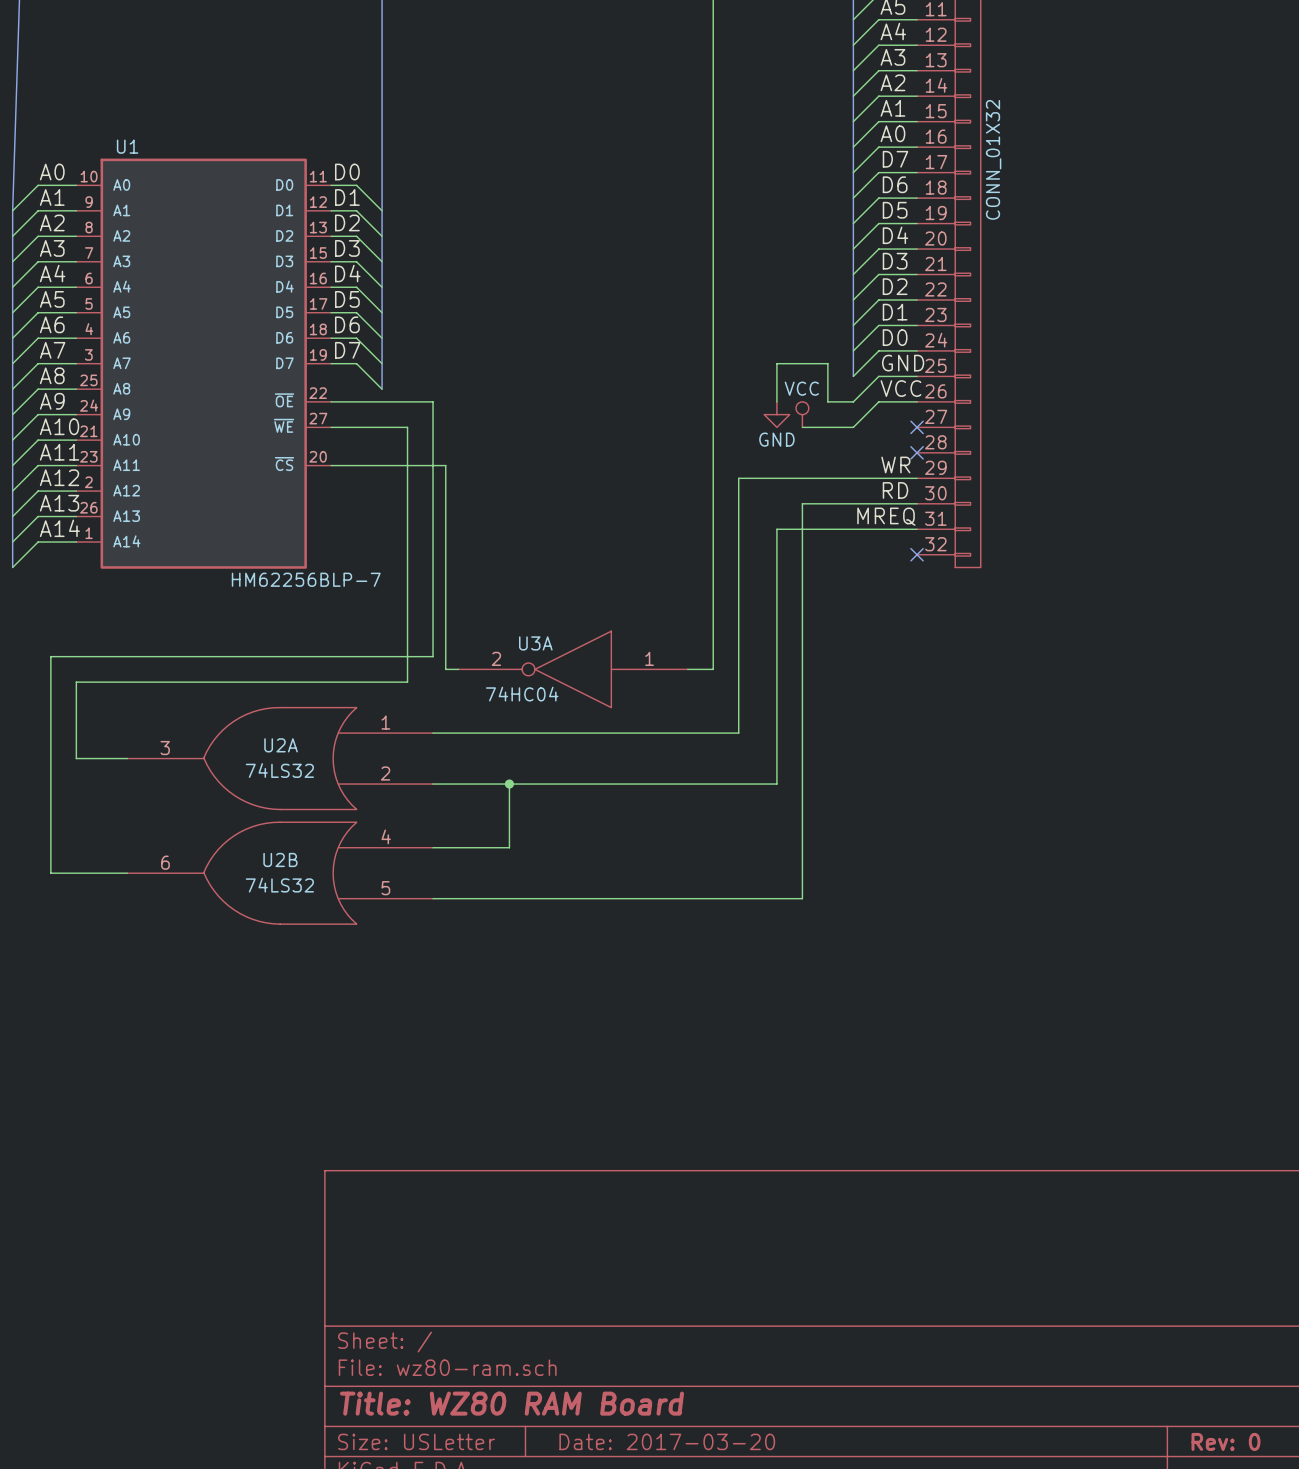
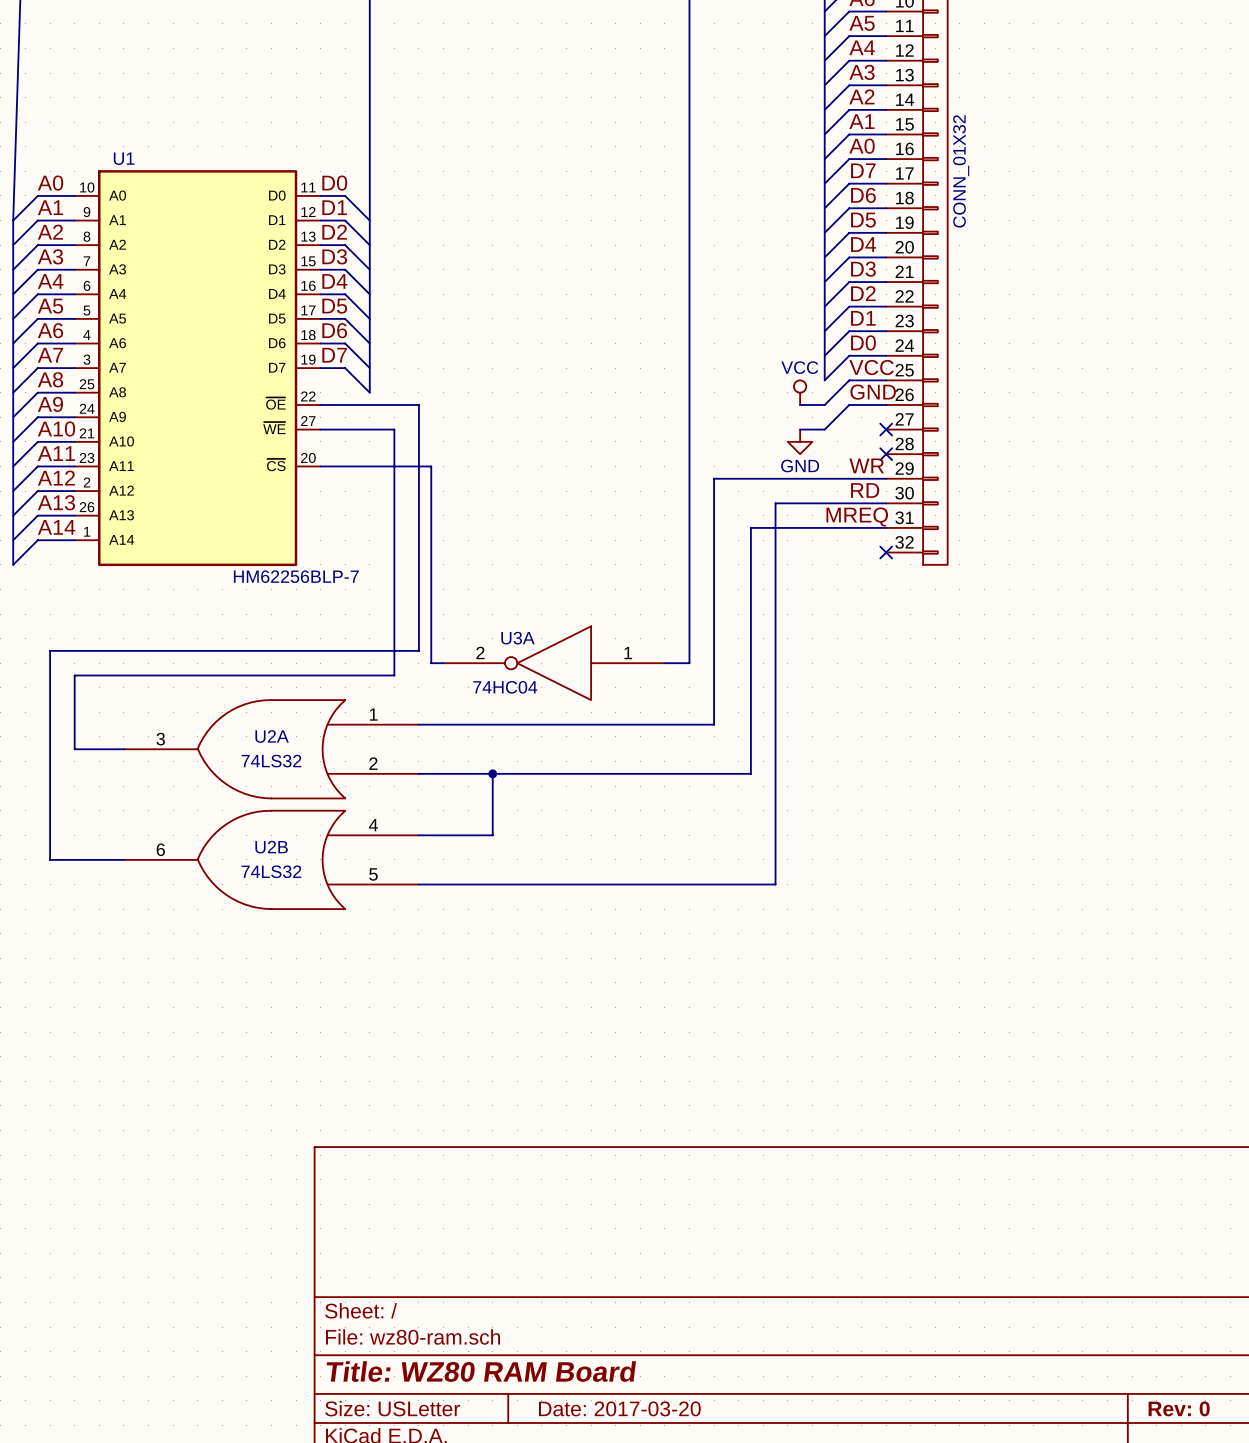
label: GND (903, 363) -> VCC (871, 367)
label: VCC (900, 388) -> GND (873, 392)
wire: (776, 401) (776, 363) (827, 363) (827, 401) -> none
power symbol position: GND (776, 414) -> GND (800, 441)
power symbol position: VCC (802, 414) -> VCC (800, 392)
wire: (802, 427) (827, 427) -> none

